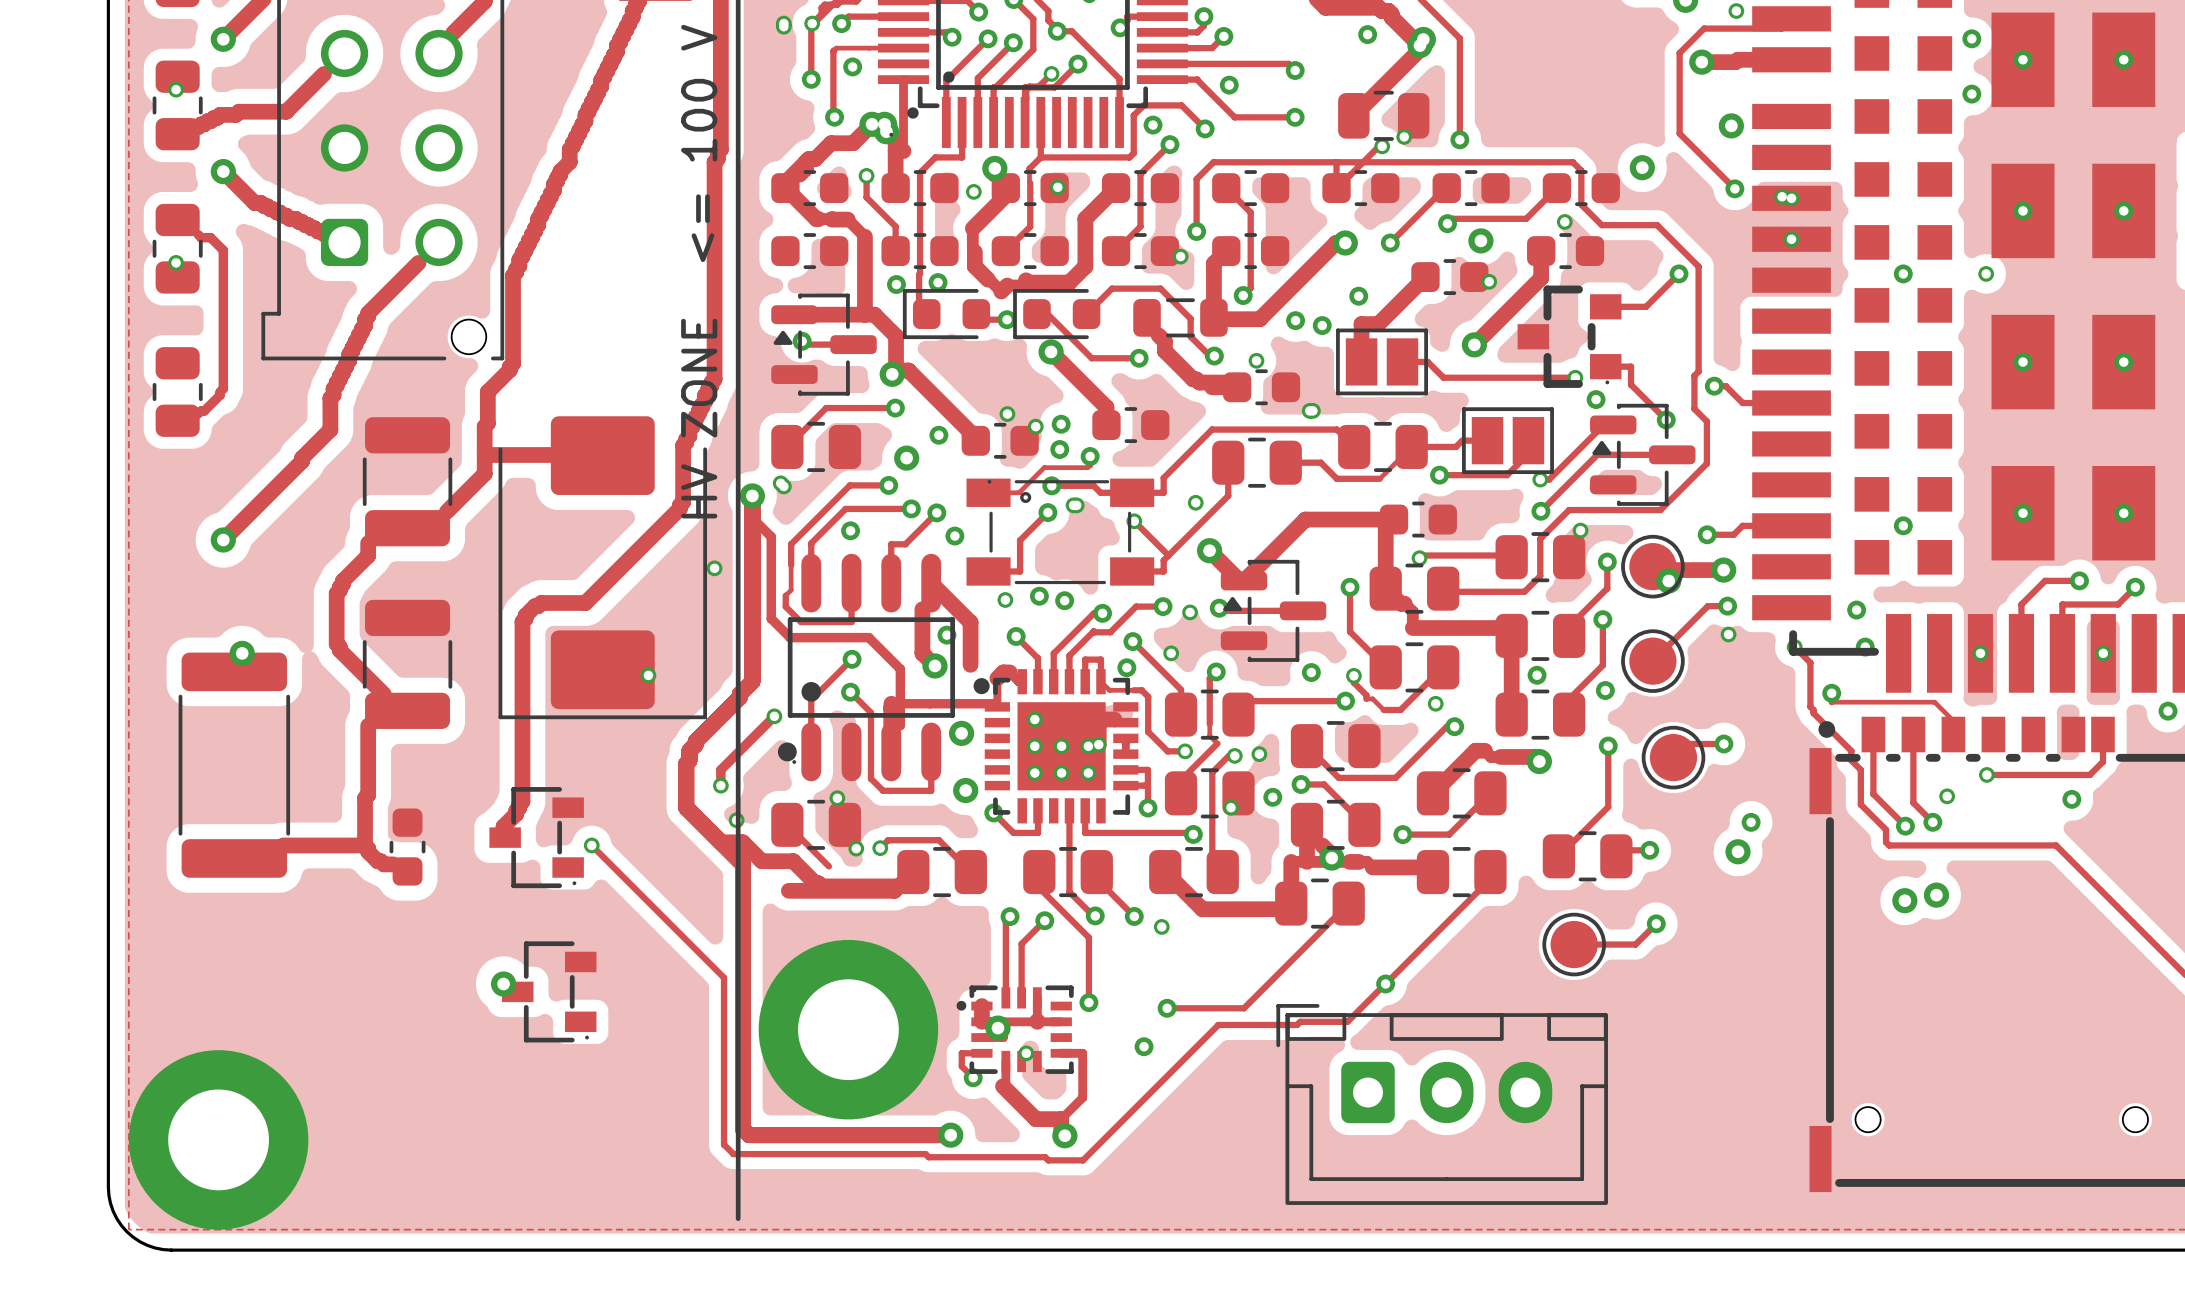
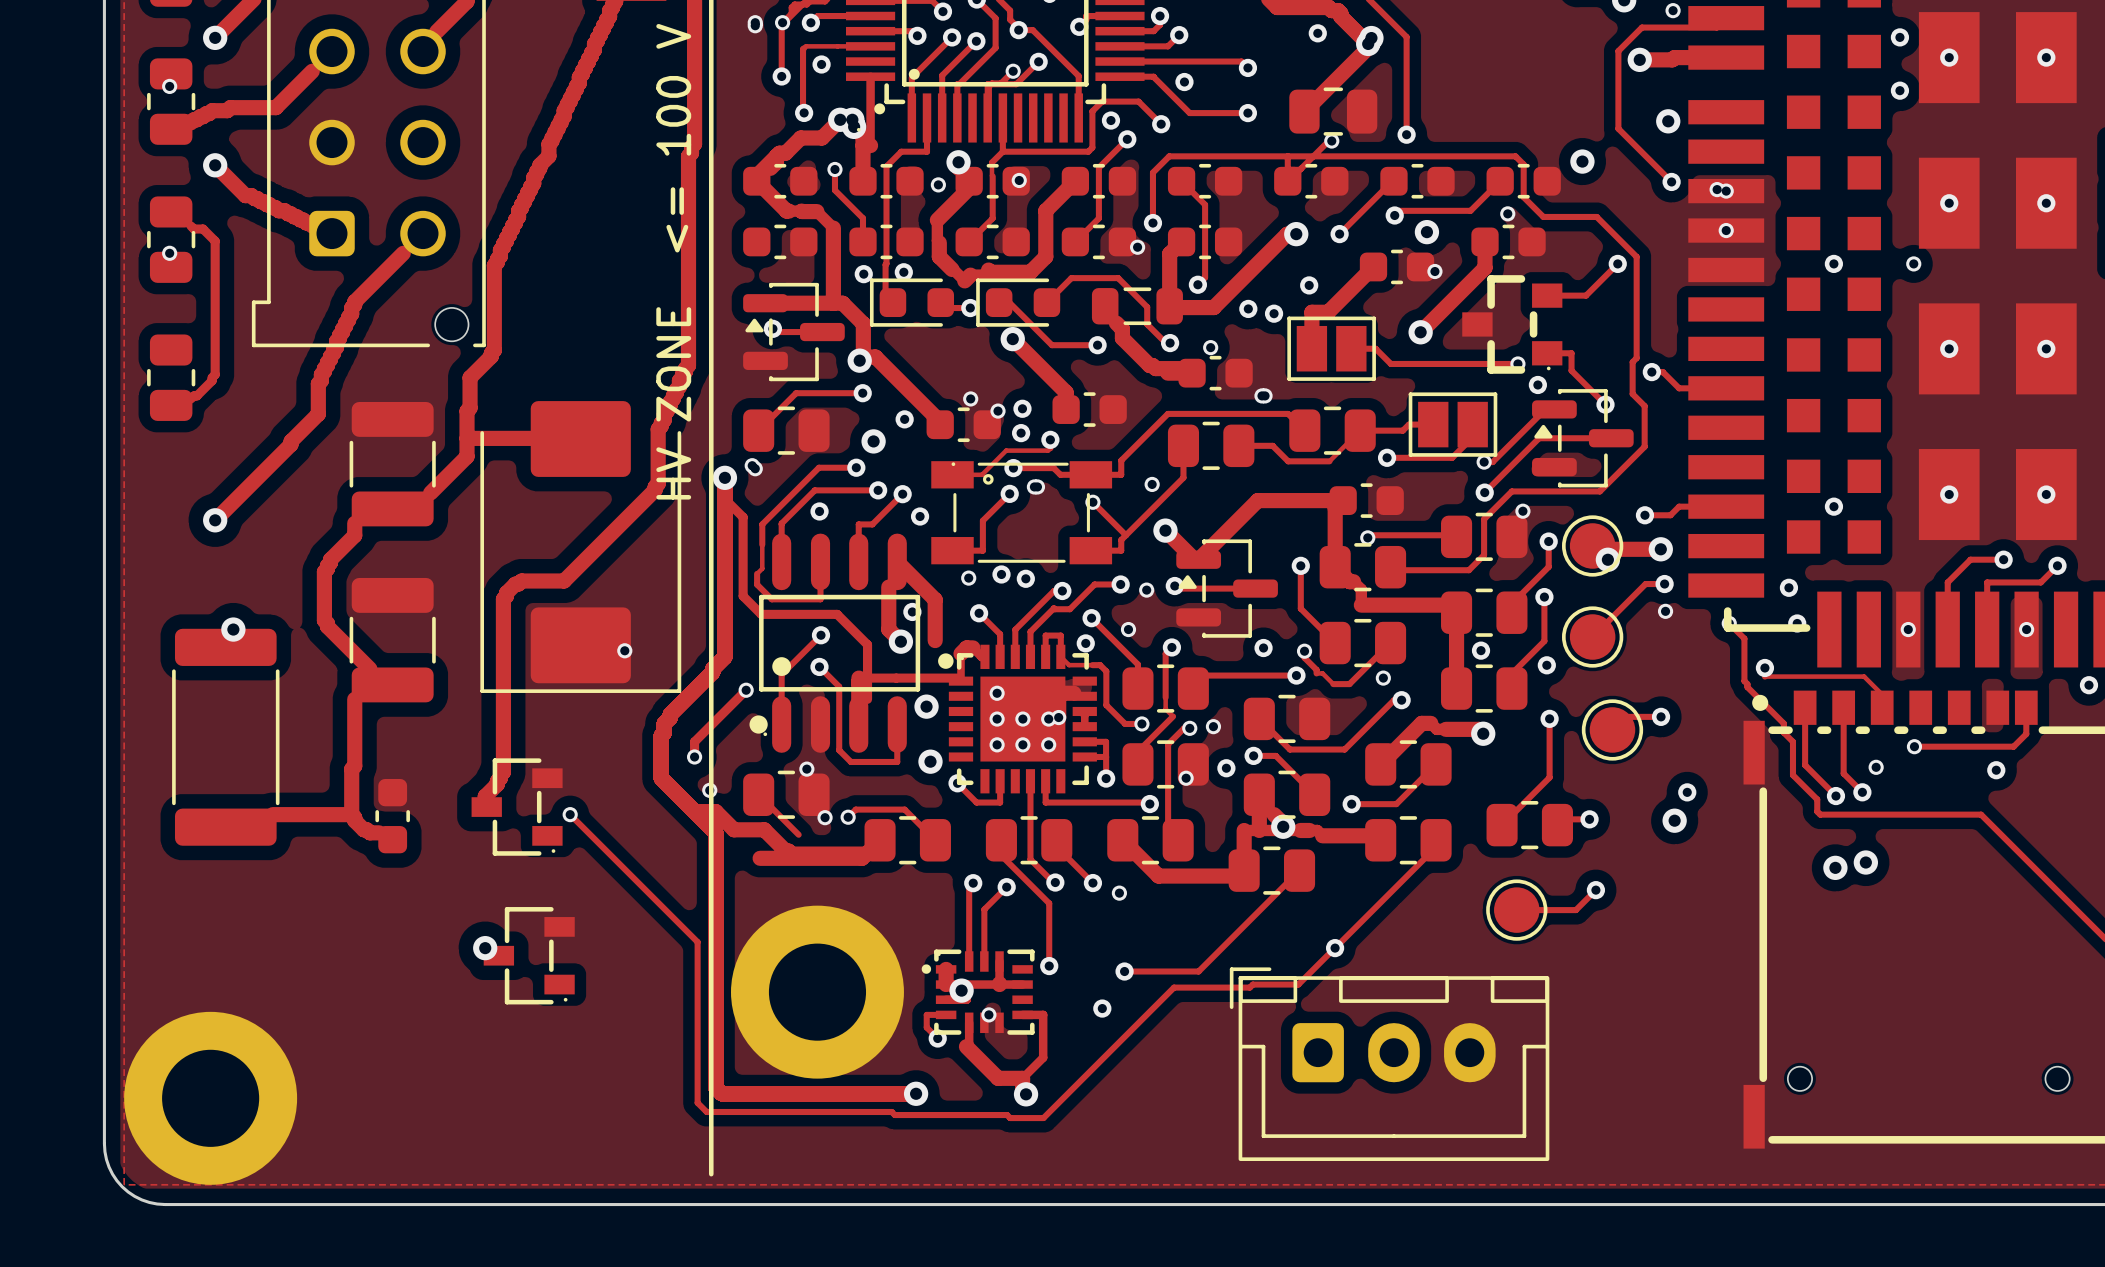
via: (1404, 136) -> none
via: (714, 568) -> none

